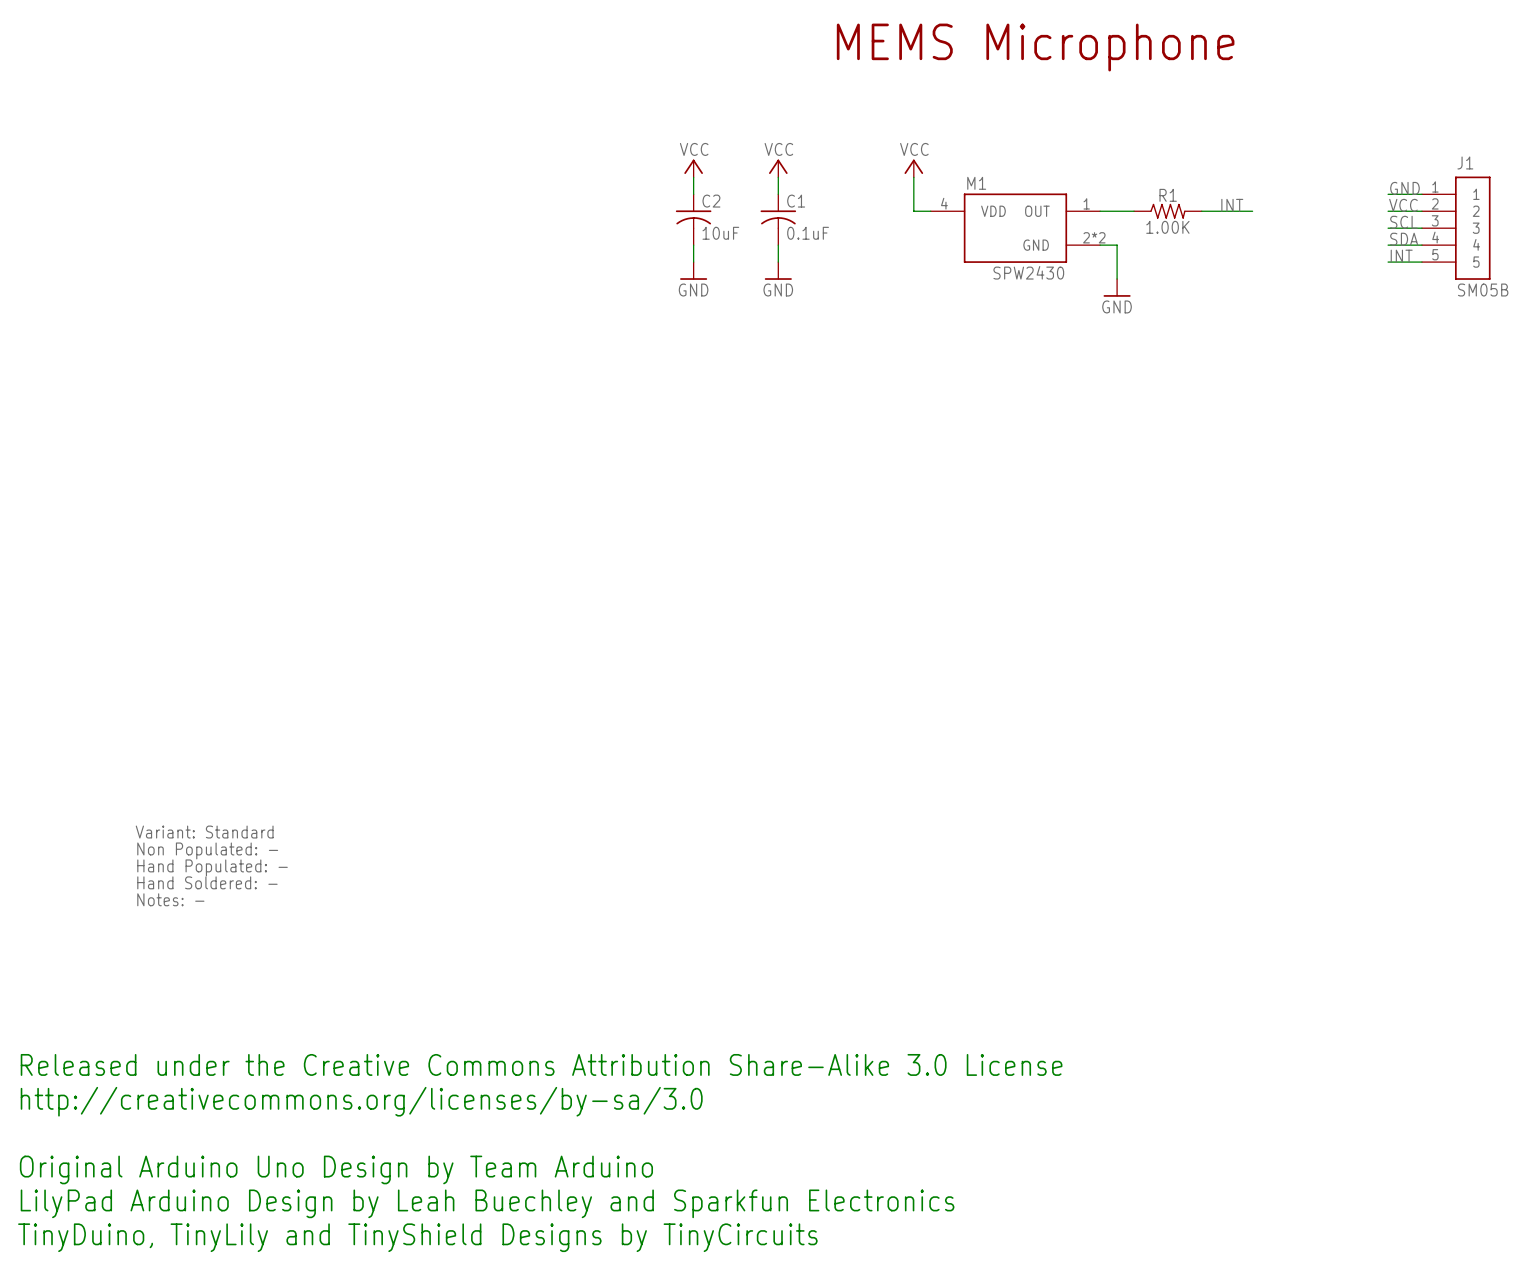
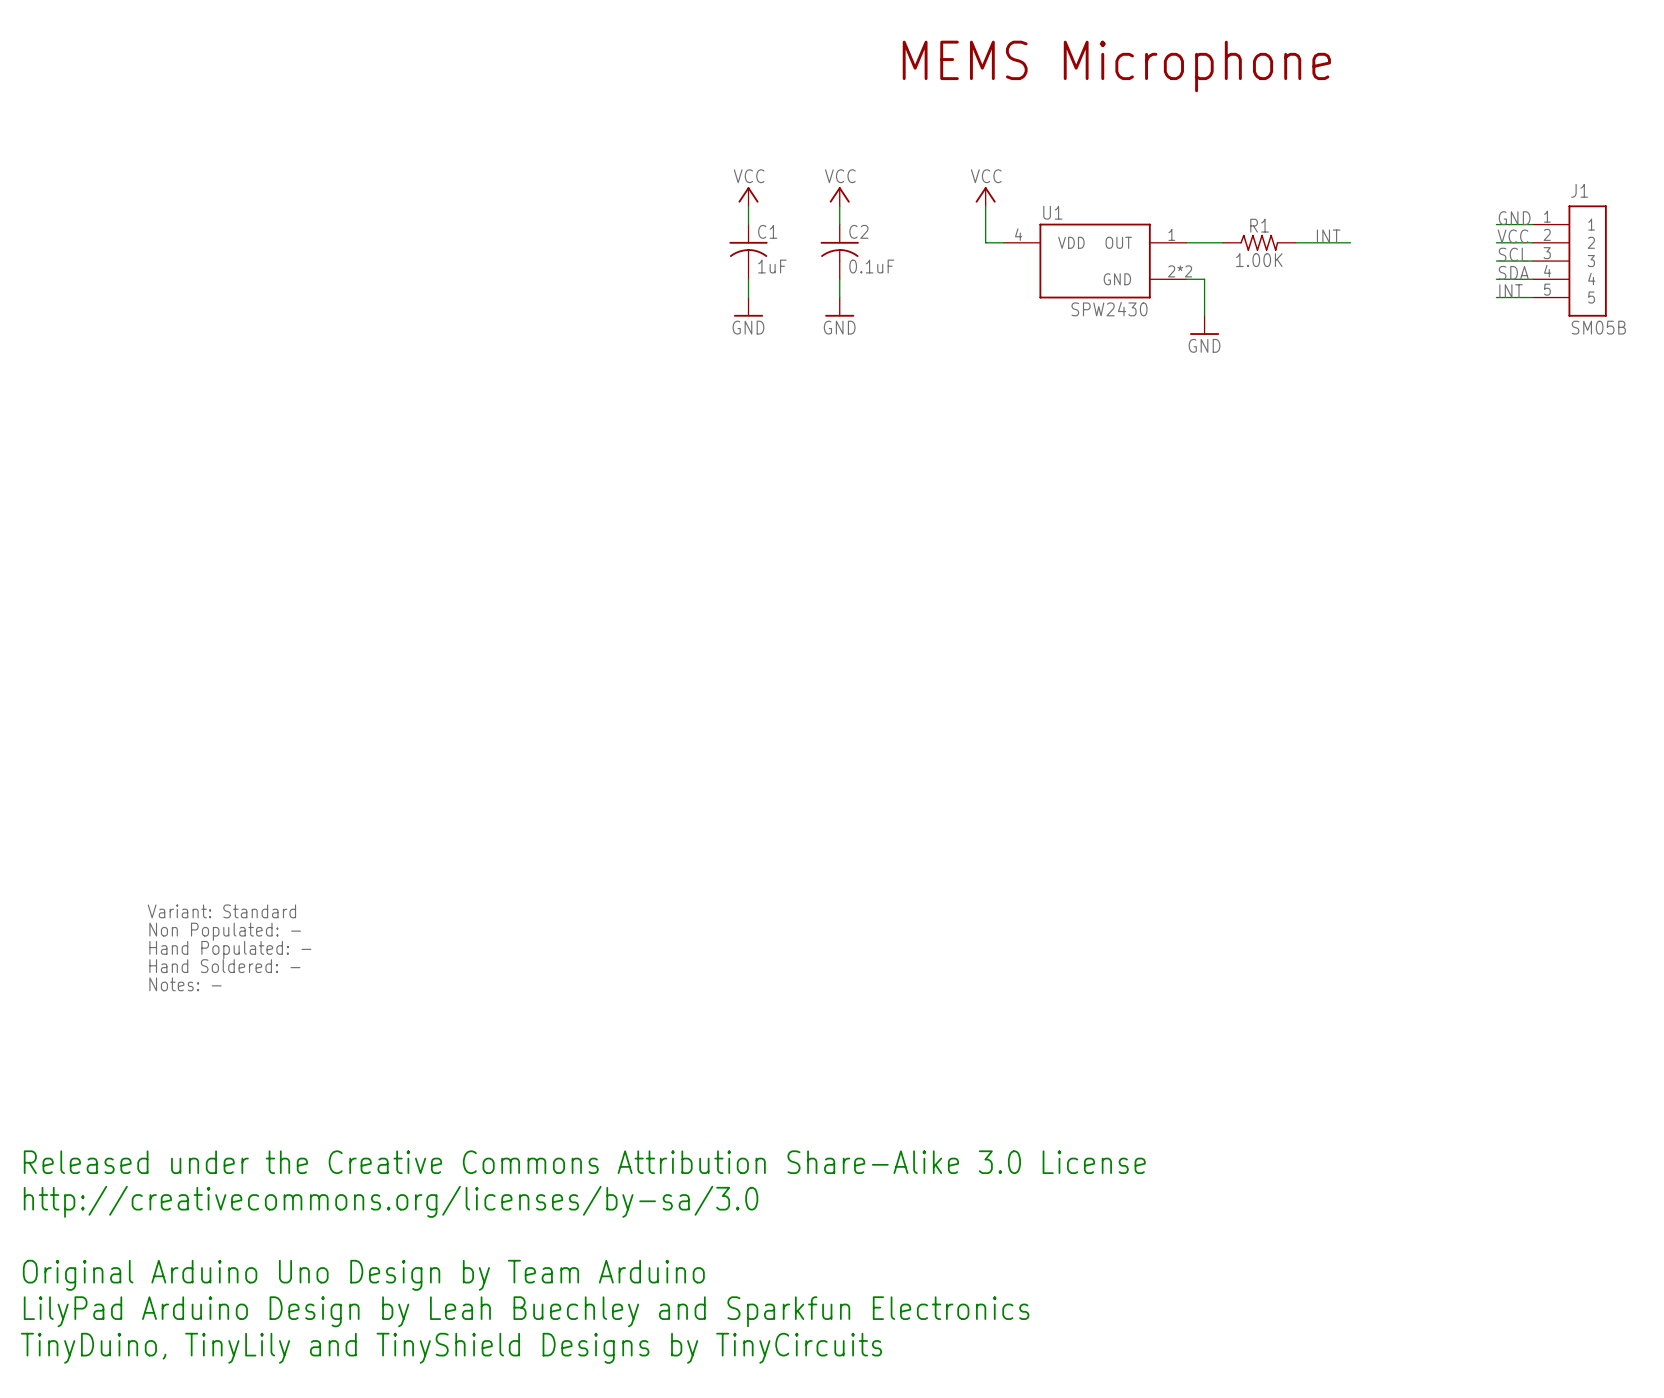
M1 name: M1 (976, 183) -> U1 (1052, 212)
C2 name: C2 (711, 201) -> C1 (767, 231)
C1 name: C1 (796, 201) -> C2 (858, 231)
C2 value: 10uF (720, 233) -> 1uF (772, 266)

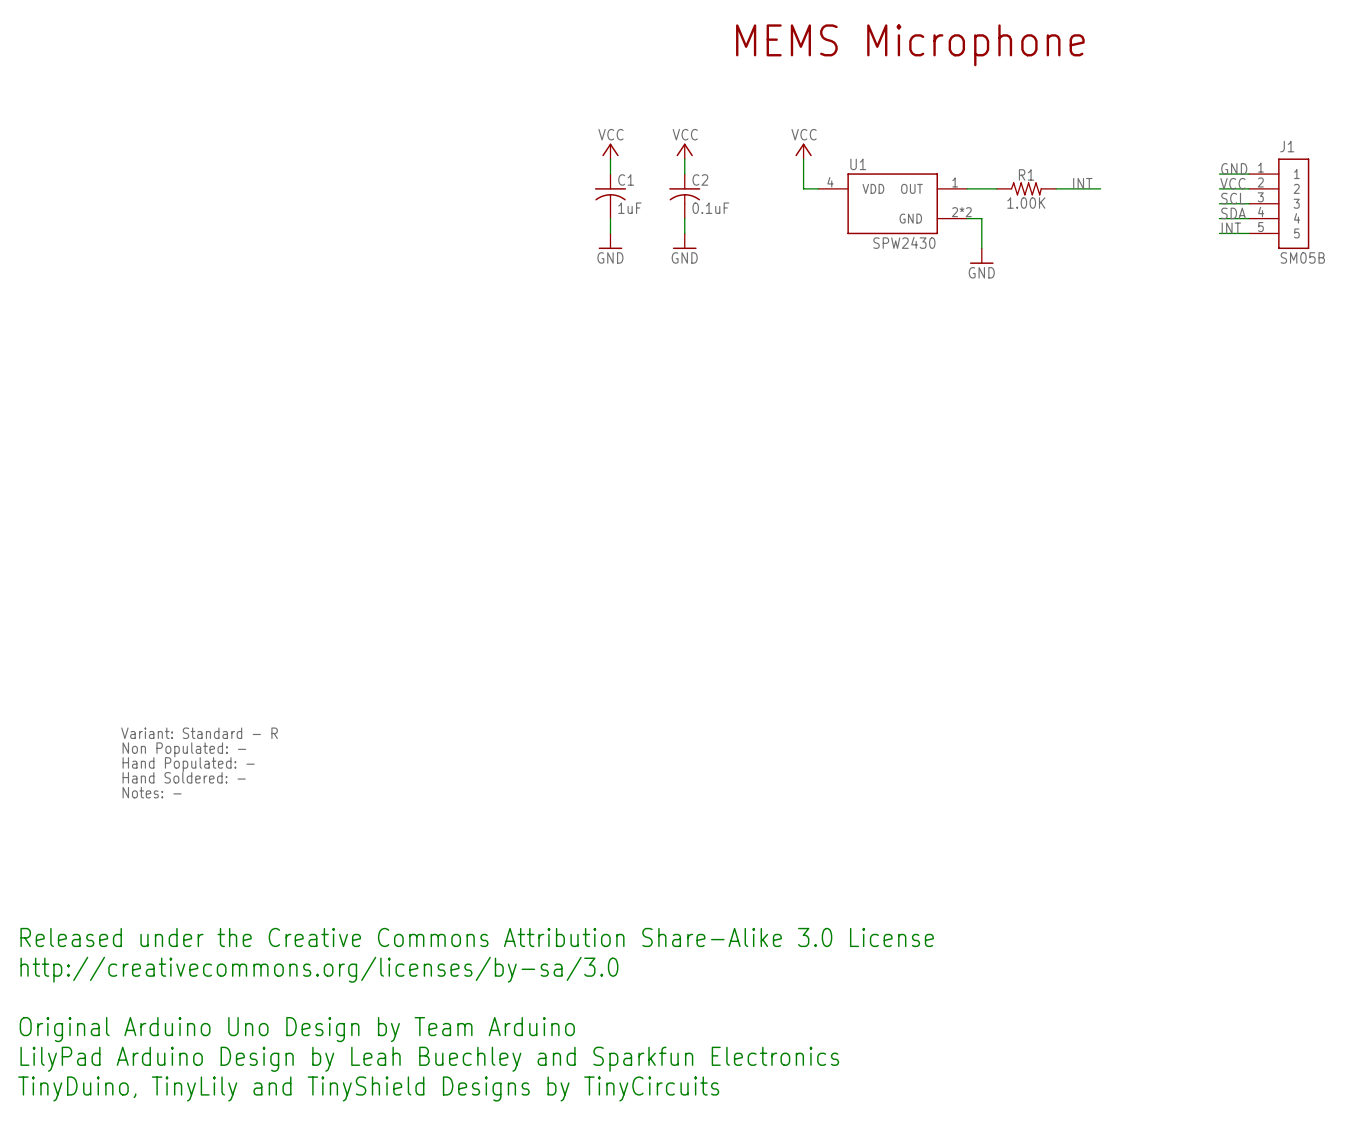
text: Variant: Standard (221, 911) -> Variant: Standard - R (199, 733)

